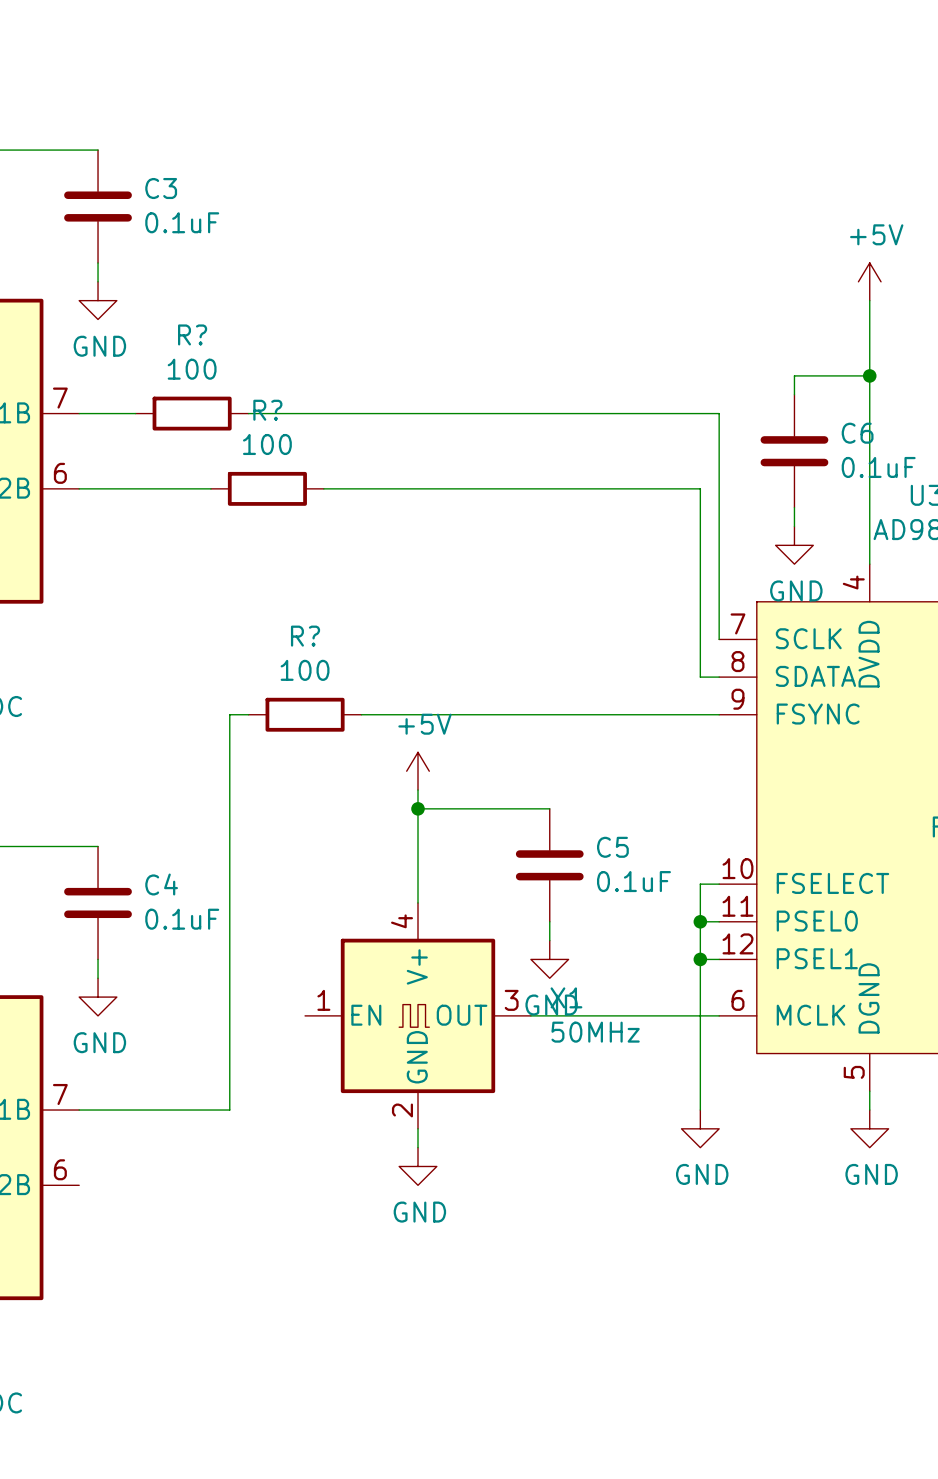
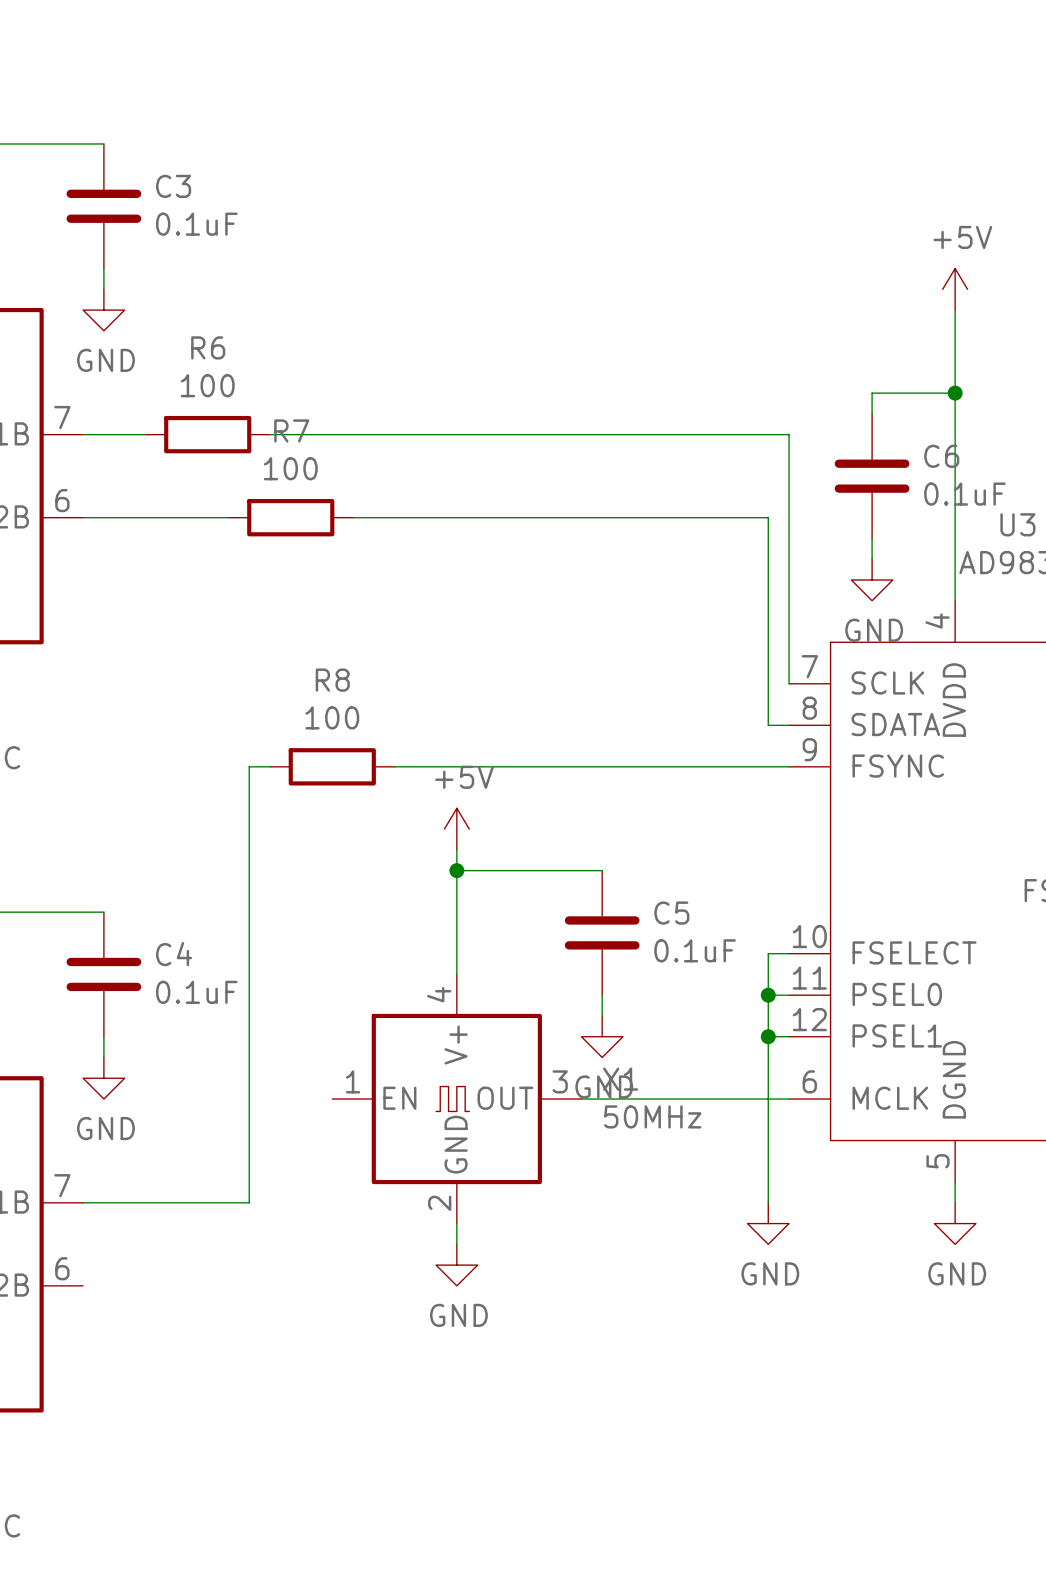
R? name: R? (192, 334) -> R6 (208, 347)
R? name: R? (267, 410) -> R7 (291, 430)
R? name: R? (305, 636) -> R8 (332, 680)

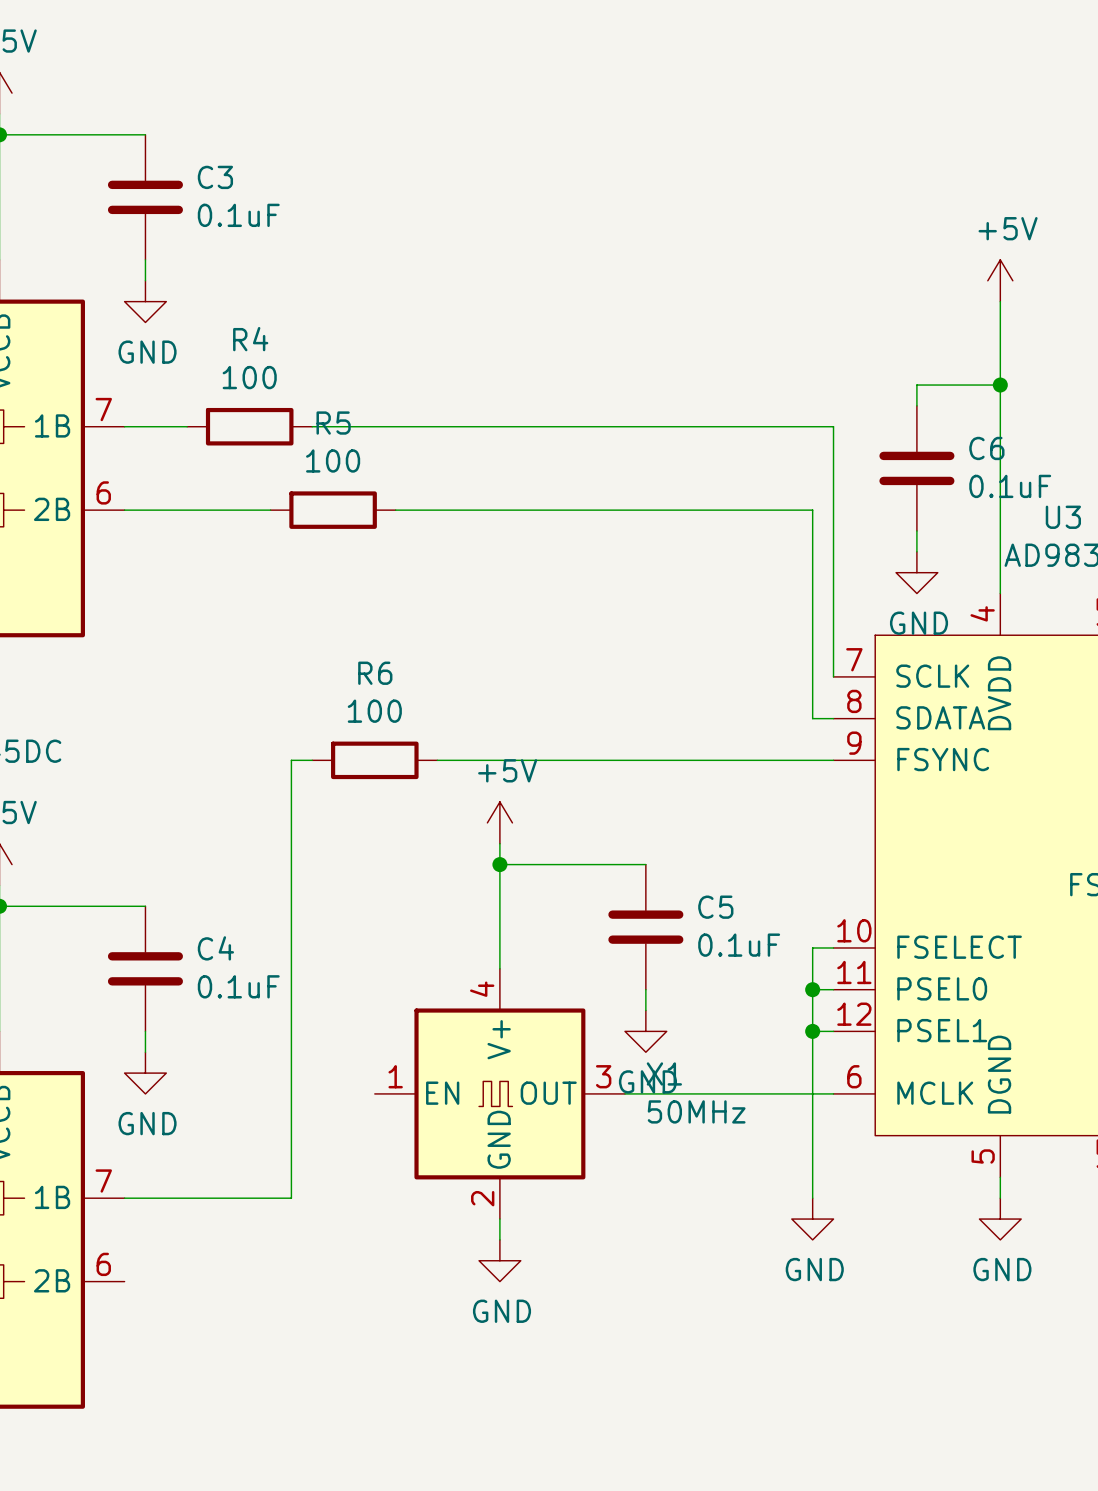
R6 name: R6 (208, 347) -> R4 (250, 339)
R7 name: R7 (291, 430) -> R5 (333, 423)
R8 name: R8 (332, 680) -> R6 (375, 673)

